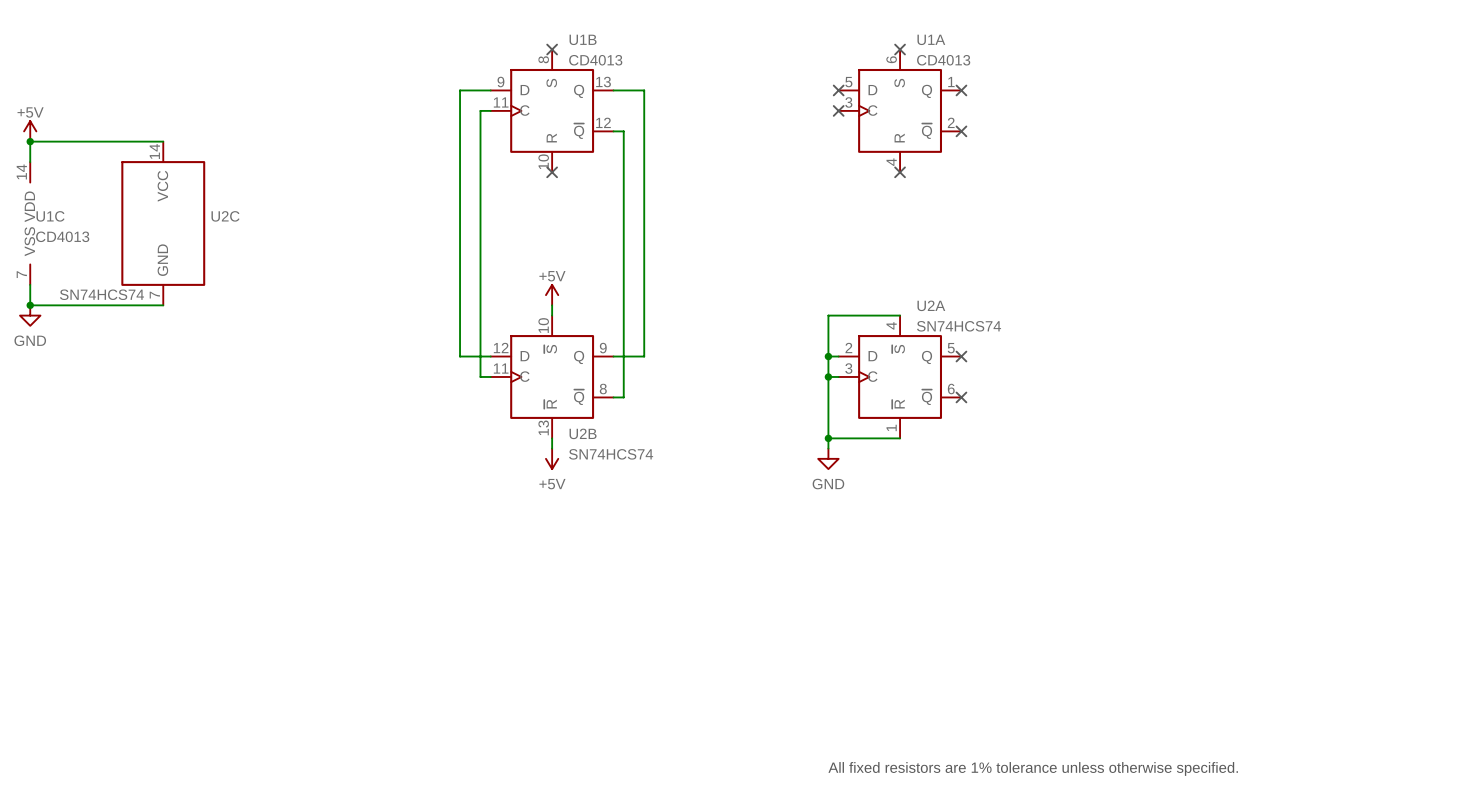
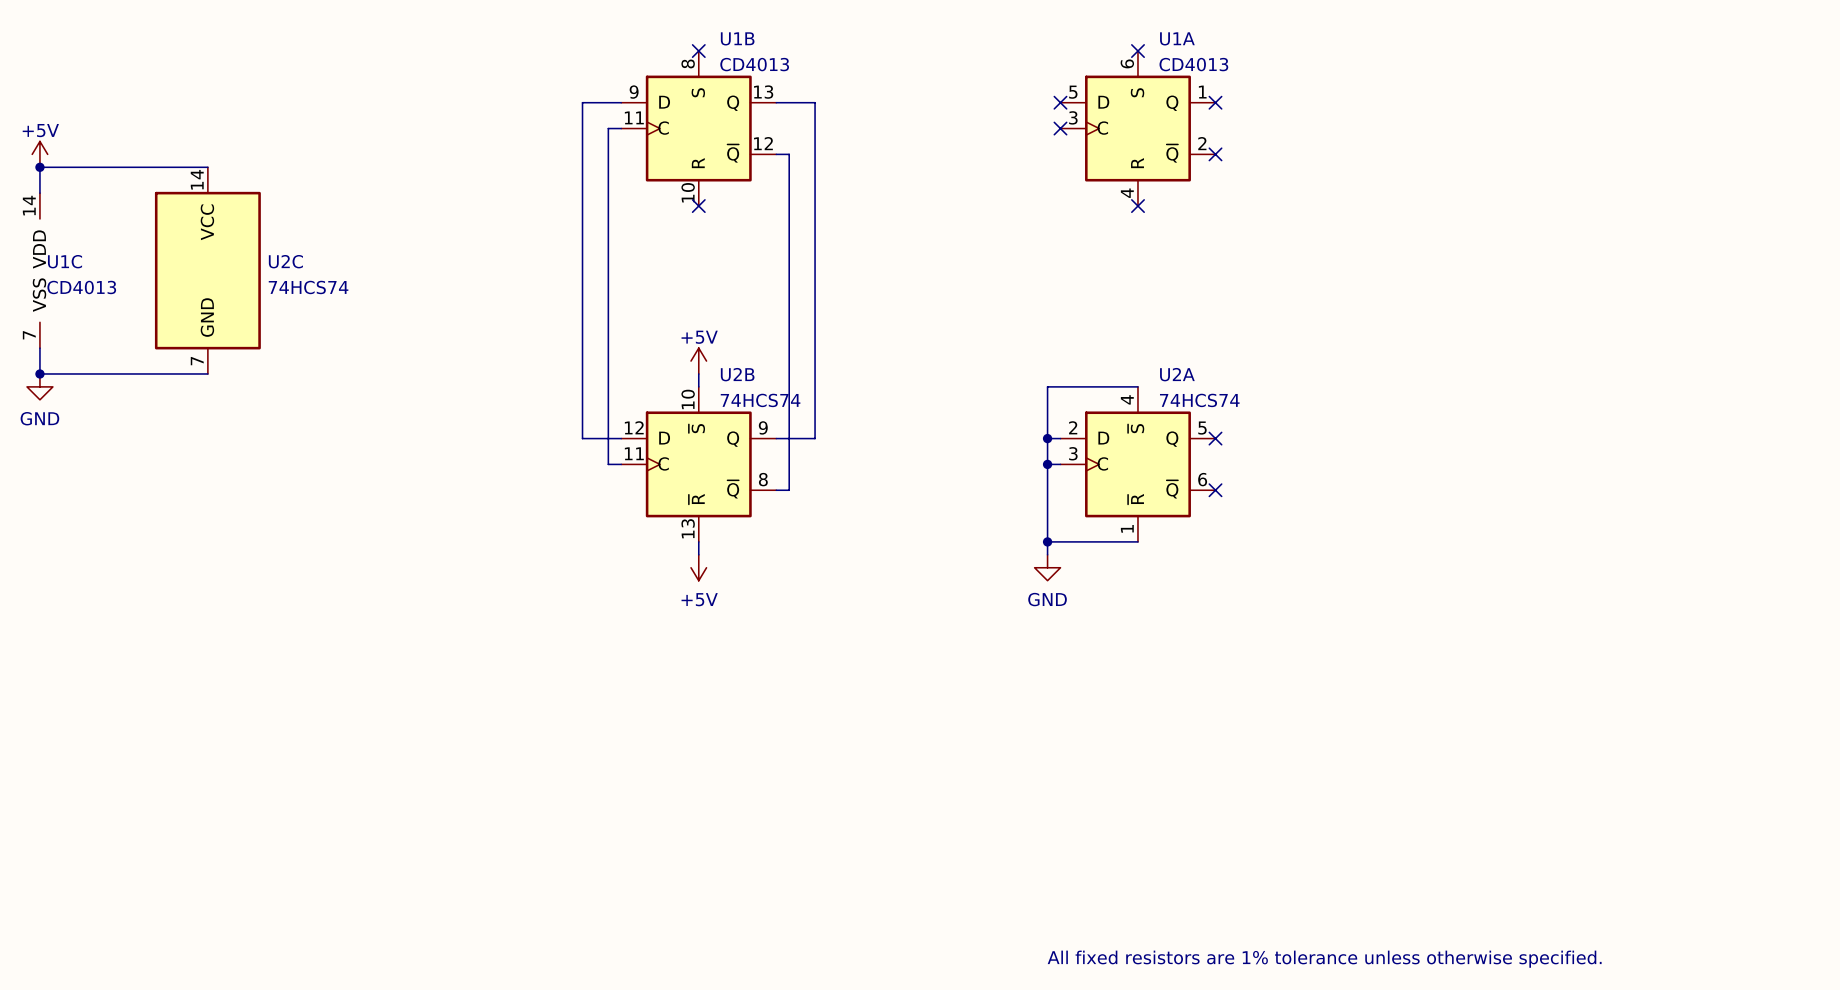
U2C value: SN74HCS74 (101, 294) -> 74HCS74 (308, 287)
U2A value: SN74HCS74 (959, 326) -> 74HCS74 (1199, 400)
U2B name position: U2B (583, 433) -> U2B (737, 374)
U2B value: SN74HCS74 (611, 454) -> 74HCS74 (760, 400)

